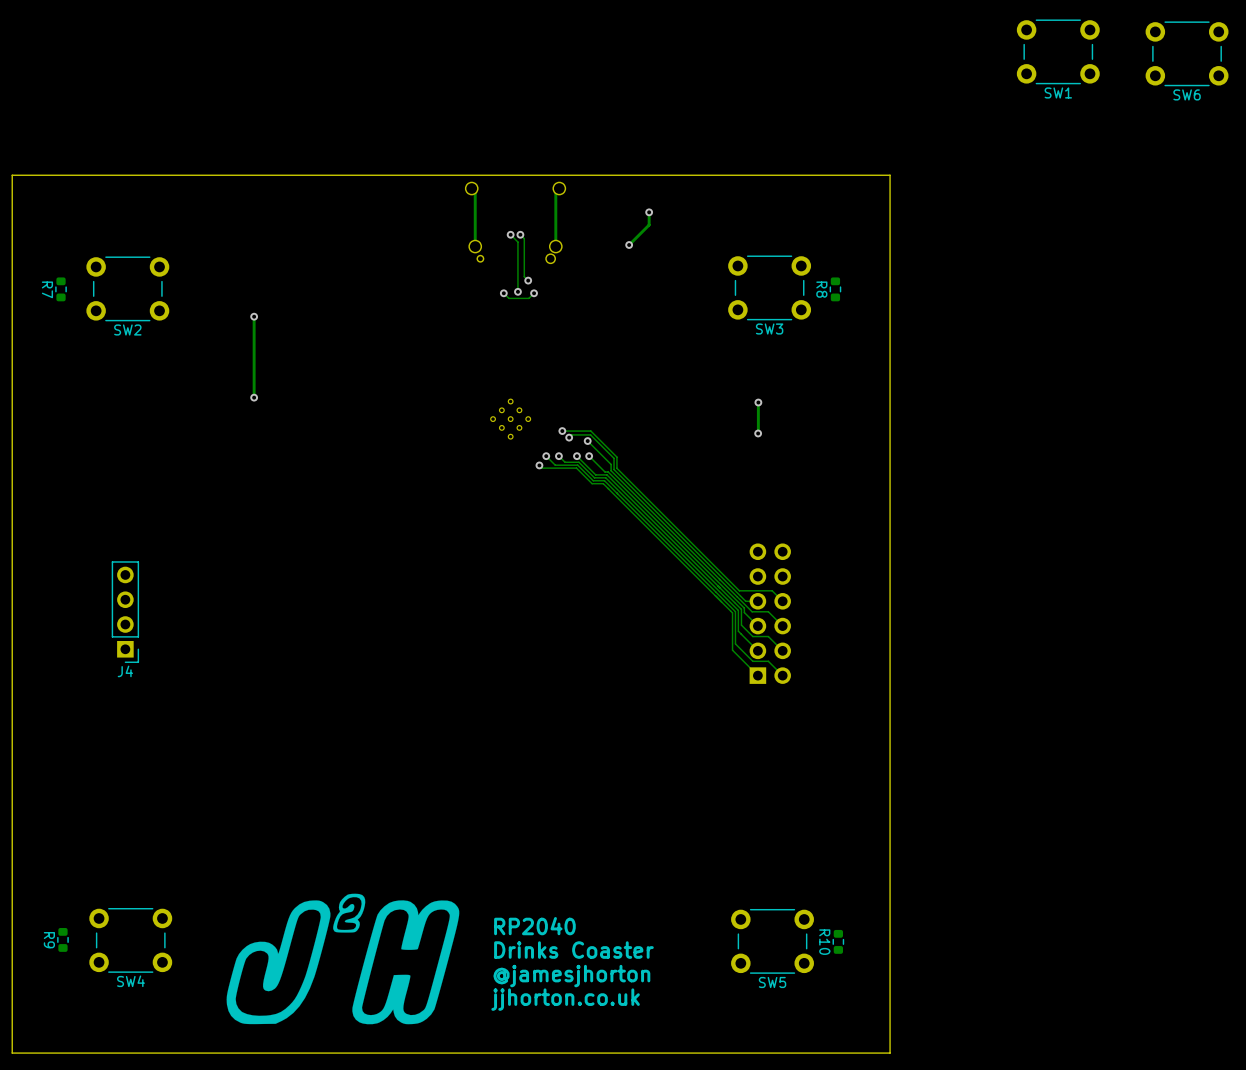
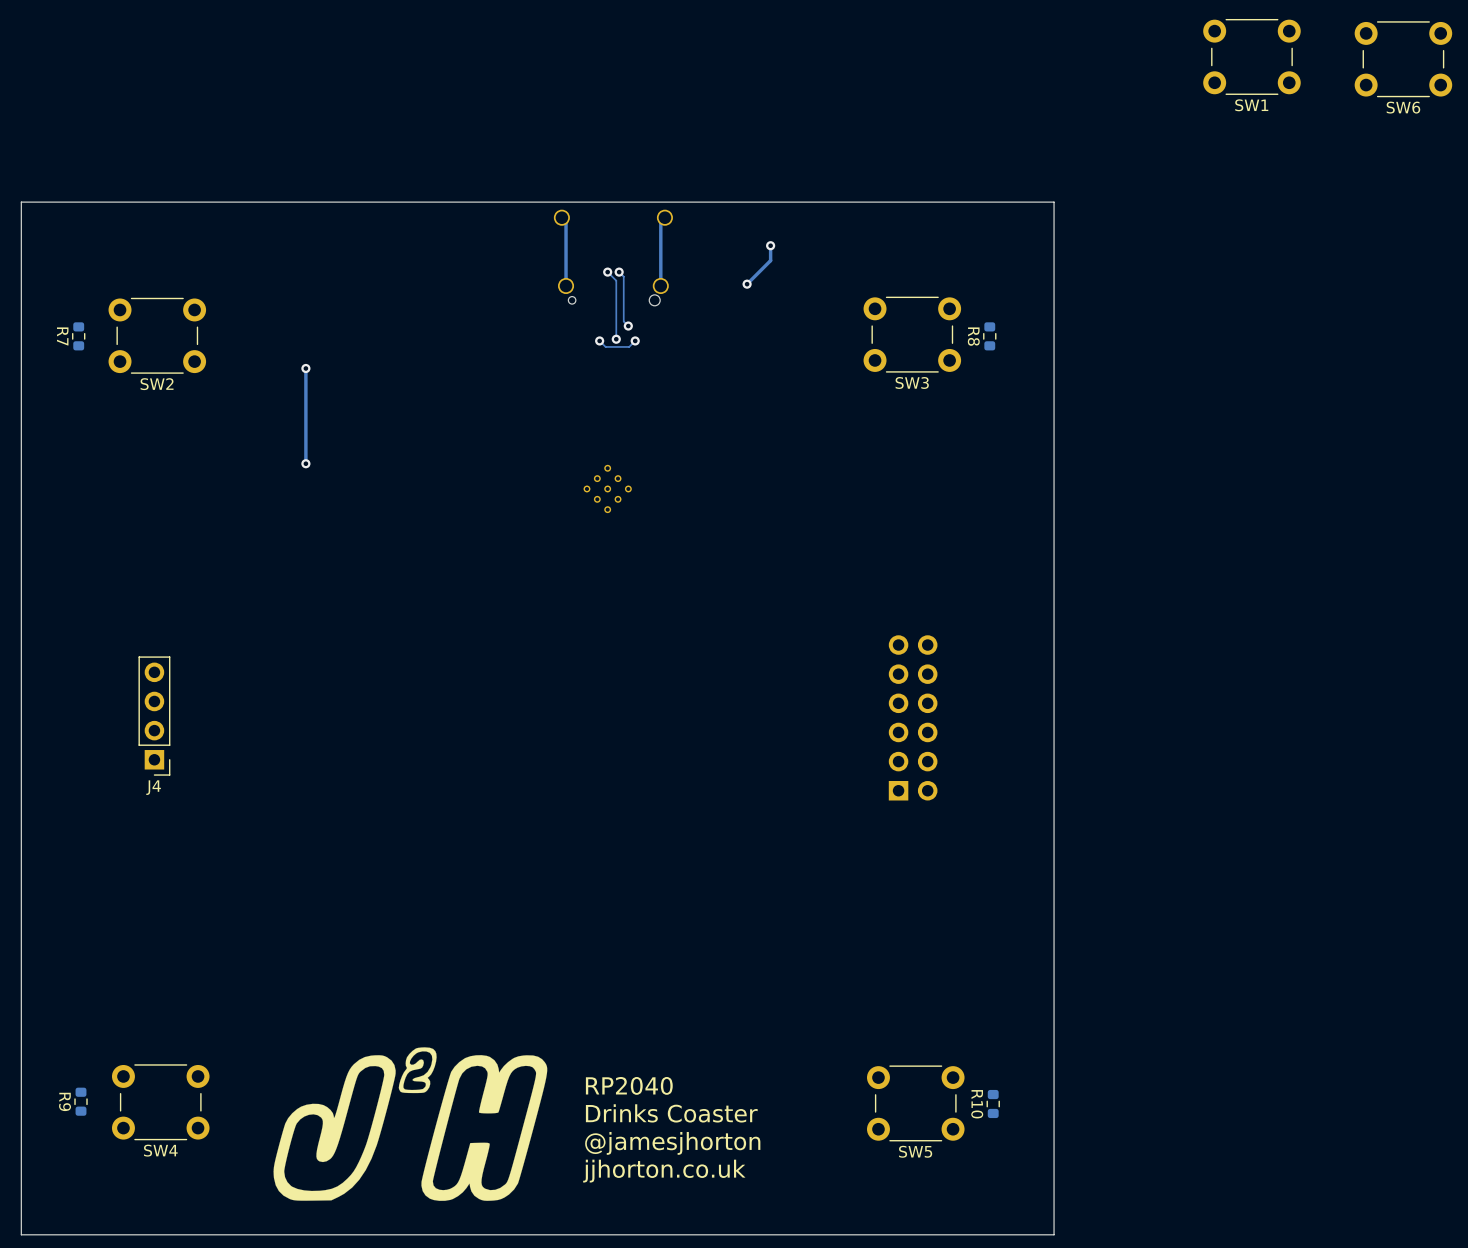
track: (758, 402) (758, 433) -> none
via: (758, 402) -> none
track: (562, 431) (590, 431) (616, 457) (616, 468) (739, 590) (772, 590) (782, 601) -> none
via: (562, 431) -> none
via: (758, 433) -> none
track: (569, 437) (571, 434) (590, 434) (614, 458) (614, 469) (745, 601) (757, 601) -> none
via: (569, 437) -> none
track: (587, 441) (611, 464) (611, 470) (752, 611) (768, 611) (782, 626) -> none
via: (587, 441) -> none
track: (546, 456) (555, 465) (577, 465) (593, 480) (604, 480) (735, 611) (735, 643) (752, 661) (768, 661) (782, 675) -> none
via: (546, 456) -> none
track: (558, 456) (565, 462) (578, 462) (594, 477) (605, 477) (738, 610) (738, 631) (741, 634) -> none
via: (558, 456) -> none
track: (576, 456) (595, 474) (606, 474) (741, 609) (741, 625) (752, 636) (768, 636) (782, 650) -> none
via: (576, 456) -> none
track: (589, 456) (604, 471) (608, 471) (744, 608) (744, 612) (757, 626) -> none
via: (589, 456) -> none
track: (539, 465) (542, 468) (576, 468) (592, 483) (603, 483) (732, 612) (732, 650) (757, 675) -> none
via: (539, 465) -> none
track: (741, 634) (757, 650) -> none

